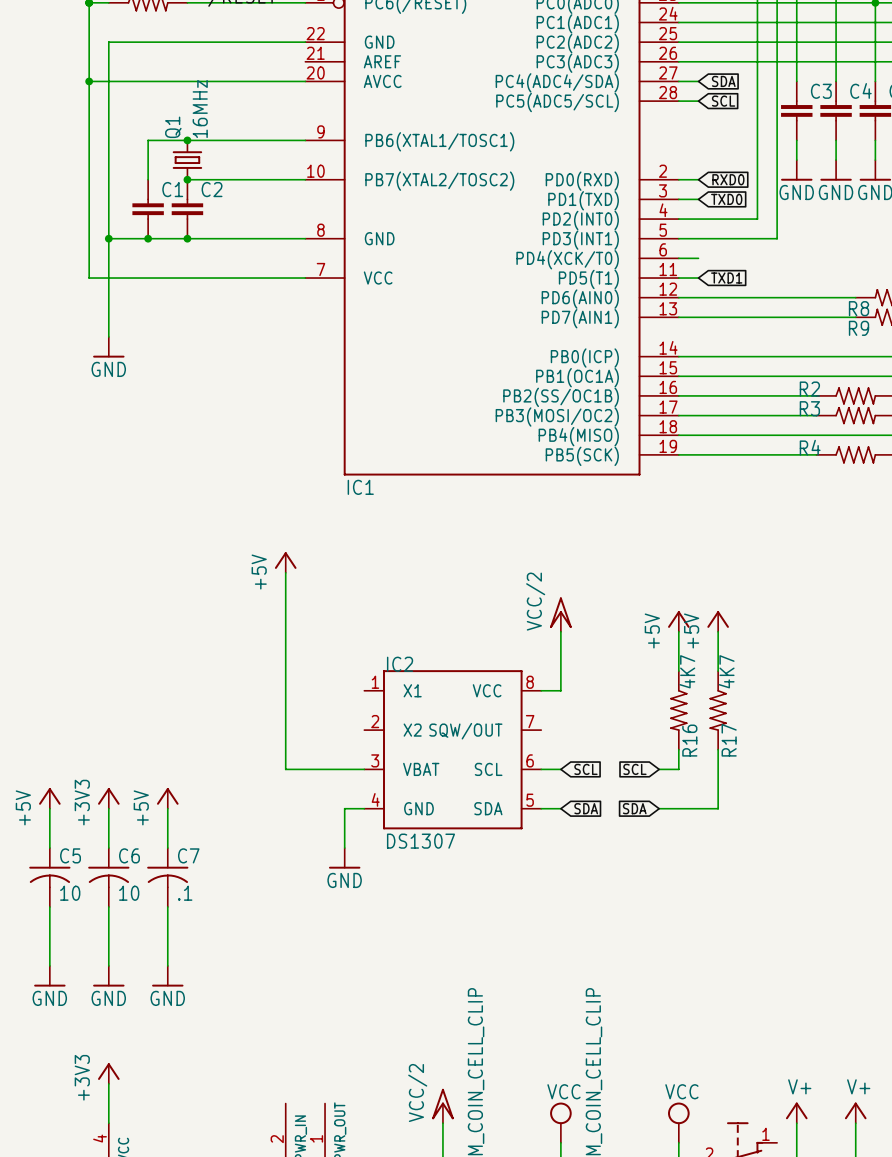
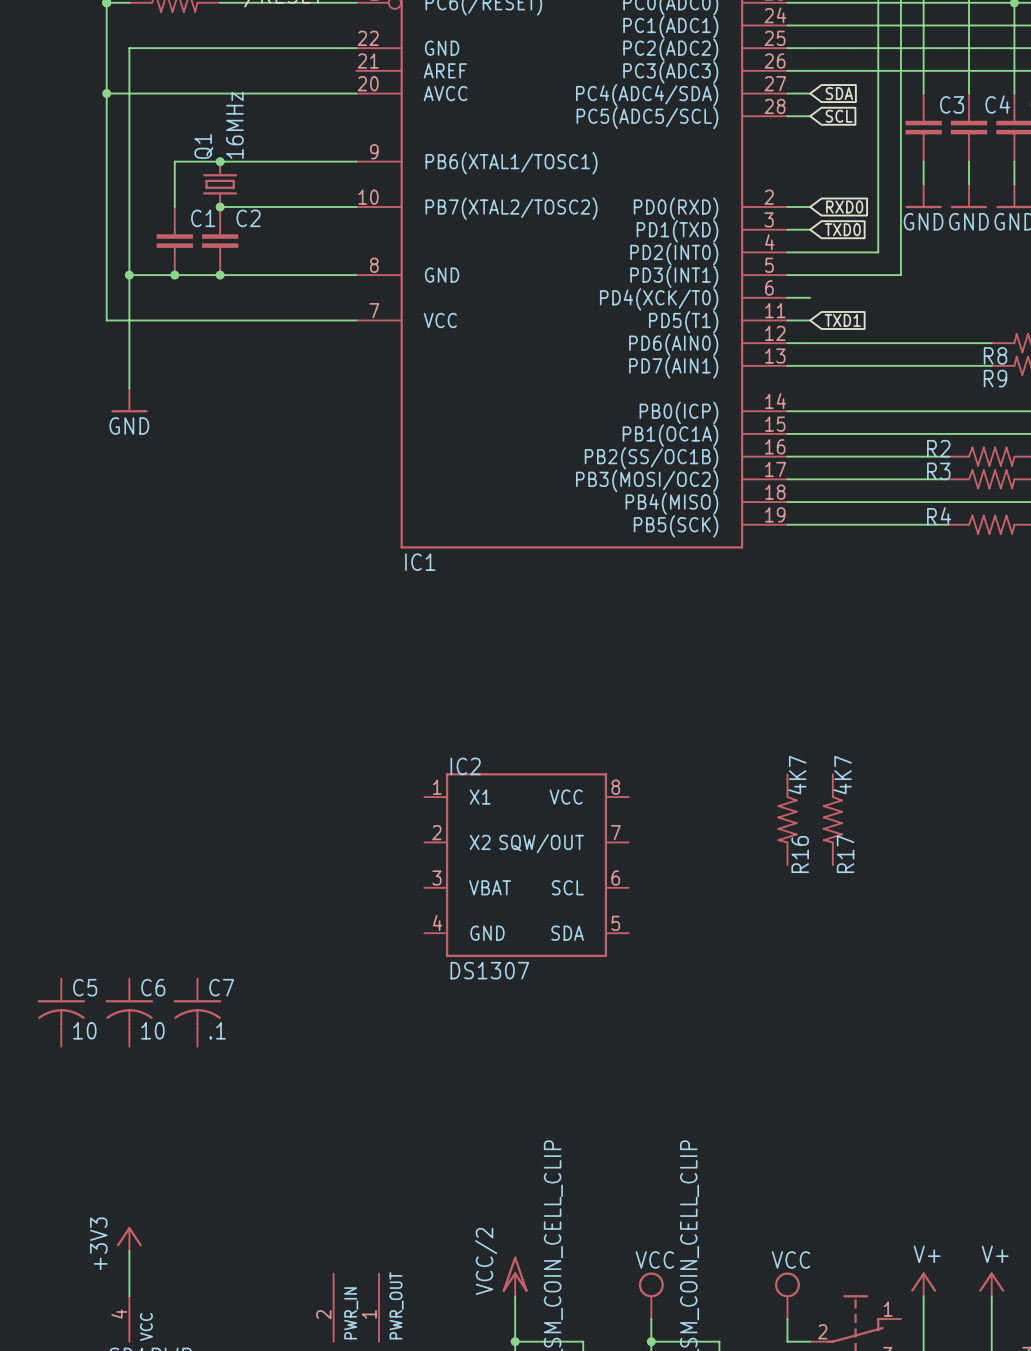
power symbol: +5V (285, 562) -> none
wire: (285, 572) (285, 769) (364, 769) -> none
power symbol: VCC/2 (560, 614) -> none
power symbol: +5V (678, 621) -> none
power symbol: +5V (718, 621) -> none
wire: (560, 631) (560, 690) (541, 690) -> none
wire: (678, 631) (678, 671) -> none
wire: (718, 631) (718, 671) -> none
wire: (678, 749) (678, 769) (659, 769) -> none
wire: (718, 749) (718, 808) (659, 808) -> none
wire: (541, 769) (560, 769) -> none
global label: SCL (585, 769) -> none
global label: SCL (634, 769) -> none
power symbol: +5V (49, 798) -> none
power symbol: +3V3 (108, 798) -> none
power symbol: +5V (167, 798) -> none
wire: (49, 808) (49, 848) -> none
wire: (108, 808) (108, 848) -> none
wire: (167, 808) (167, 848) -> none
wire: (364, 808) (344, 808) (344, 848) -> none
wire: (541, 808) (560, 808) -> none
global label: SDA (586, 808) -> none
global label: SDA (634, 808) -> none
power symbol: GND (344, 858) -> none
wire: (49, 906) (49, 965) -> none
wire: (108, 906) (108, 965) -> none
wire: (167, 906) (167, 965) -> none
power symbol: GND (49, 976) -> none
power symbol: GND (108, 976) -> none
power symbol: GND (167, 976) -> none

